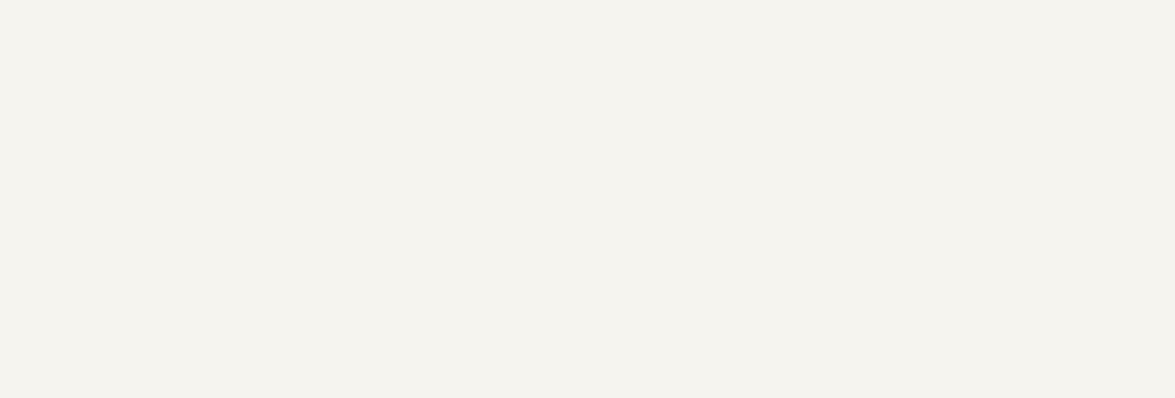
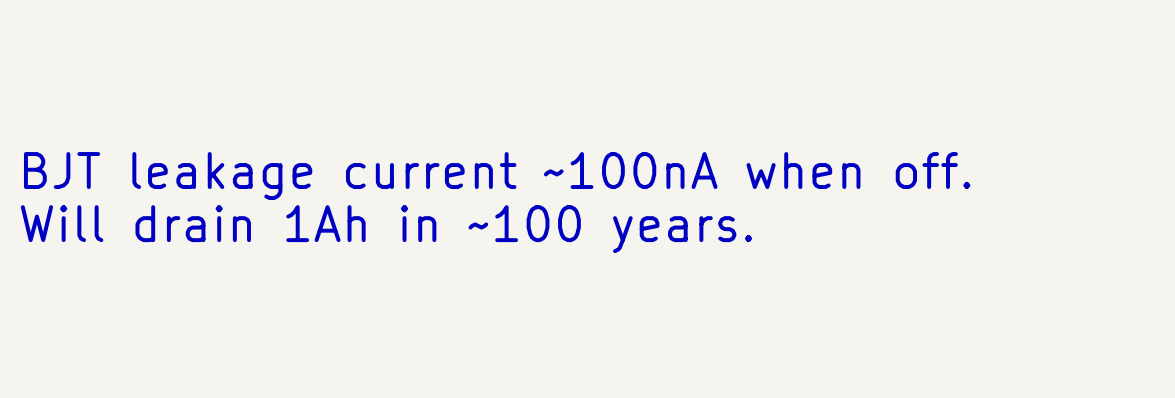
text: none -> BJT leakage current ~100nA when off. (497, 176)
text: none -> Will drain 1Ah in ~100 years. (386, 229)

